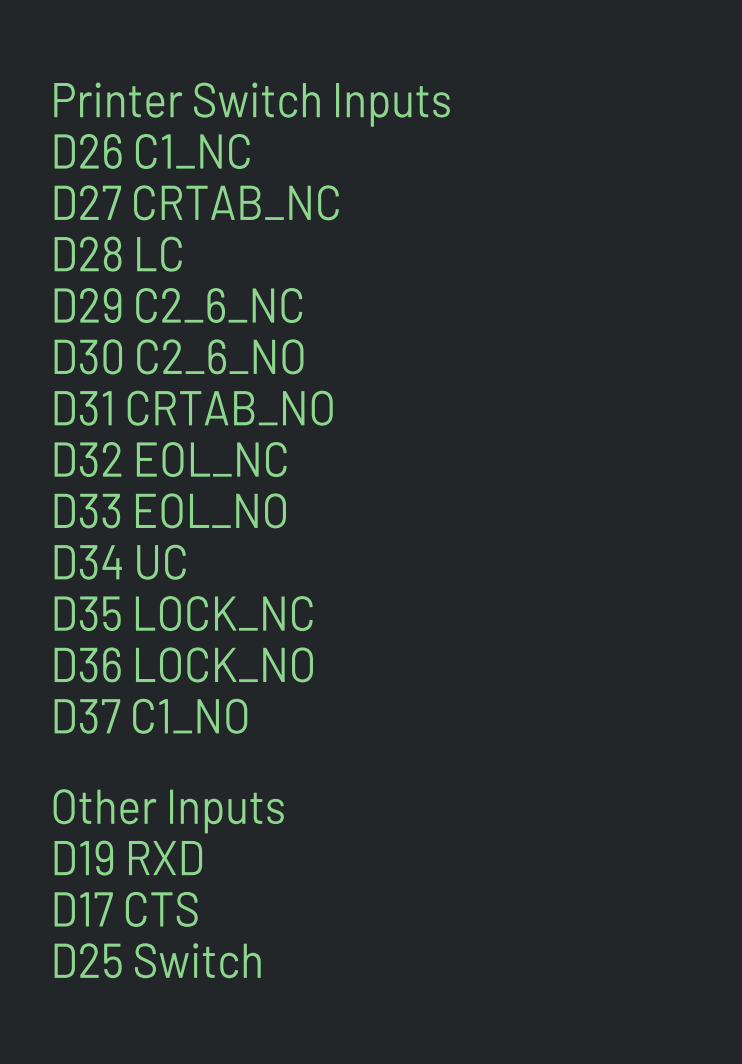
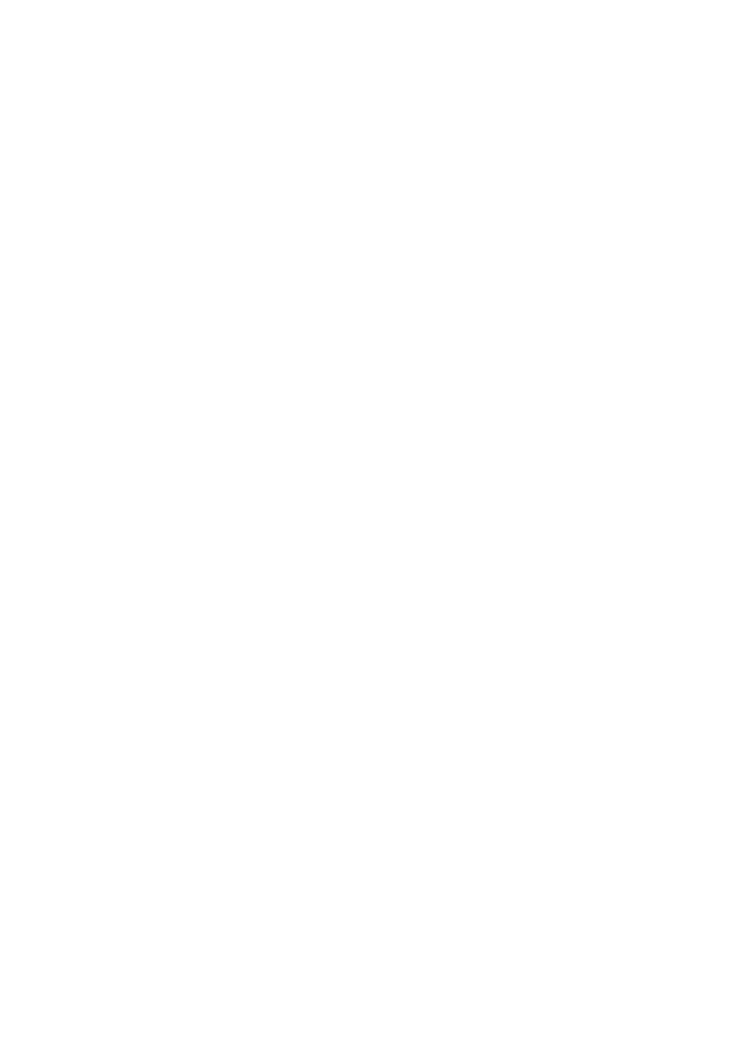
text: Printer Switch Inputs (252, 104) -> none
text: D26 C1_NC (152, 151) -> none
text: D27 CRTAB_NC (196, 202) -> none
text: D28 LC (118, 254) -> none
text: D29 C2_6_NC (178, 305) -> none
text: D30 C2_6_NO (179, 356) -> none
text: D31 CRTAB_NO (193, 408) -> none
text: D32 EOL_NC (170, 459) -> none
text: D33 EOL_NO (170, 510) -> none
text: D34 UC (120, 562) -> none
text: D35 LOCK_NC (183, 613) -> none
text: D36 LOCK_NO (183, 664) -> none
text: D37 C1_NO (150, 716) -> none
text: Other Inputs (168, 811) -> none
text: D19 RXD (128, 858) -> none
text: D17 CTS (126, 909) -> none
text: D25 Switch (157, 960) -> none

